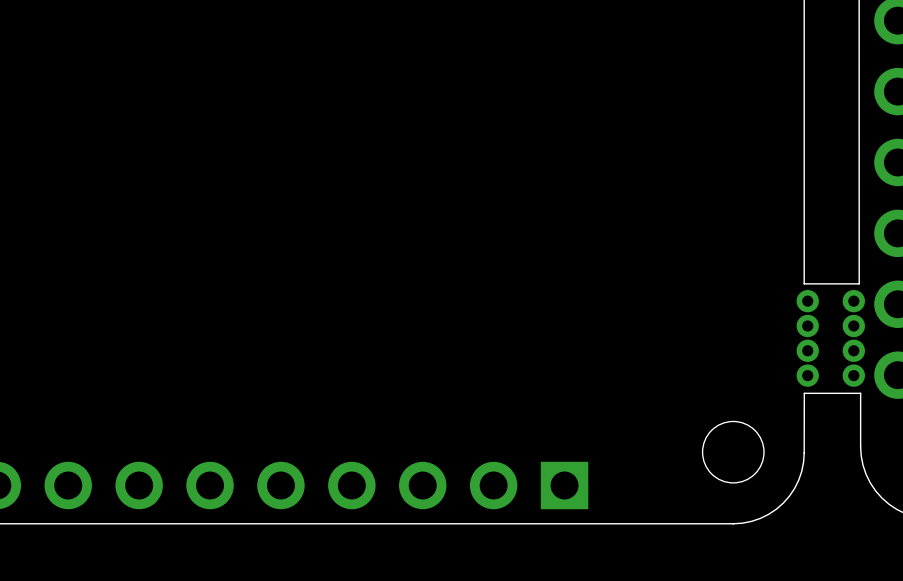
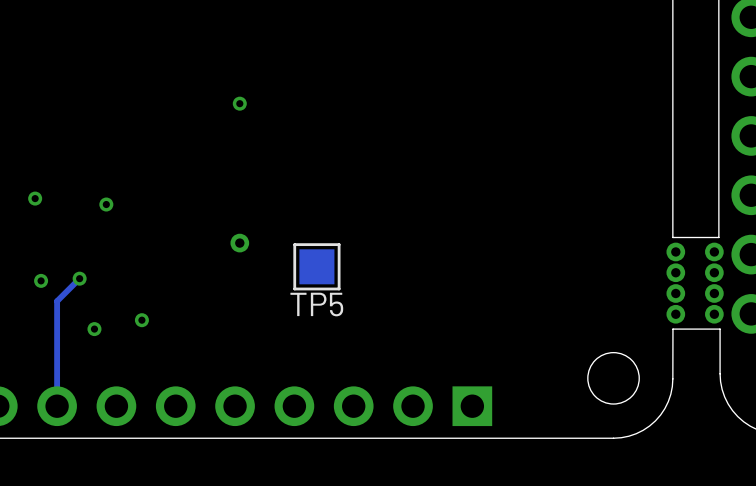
via: none -> (239, 103)
via: none -> (35, 198)
via: none -> (106, 204)
via: none -> (239, 243)
TP5: none -> (316, 266)
track: none -> (79, 278) (57, 301) (57, 406)
via: none -> (79, 278)
via: none -> (41, 280)
via: none -> (141, 320)
via: none -> (94, 329)

